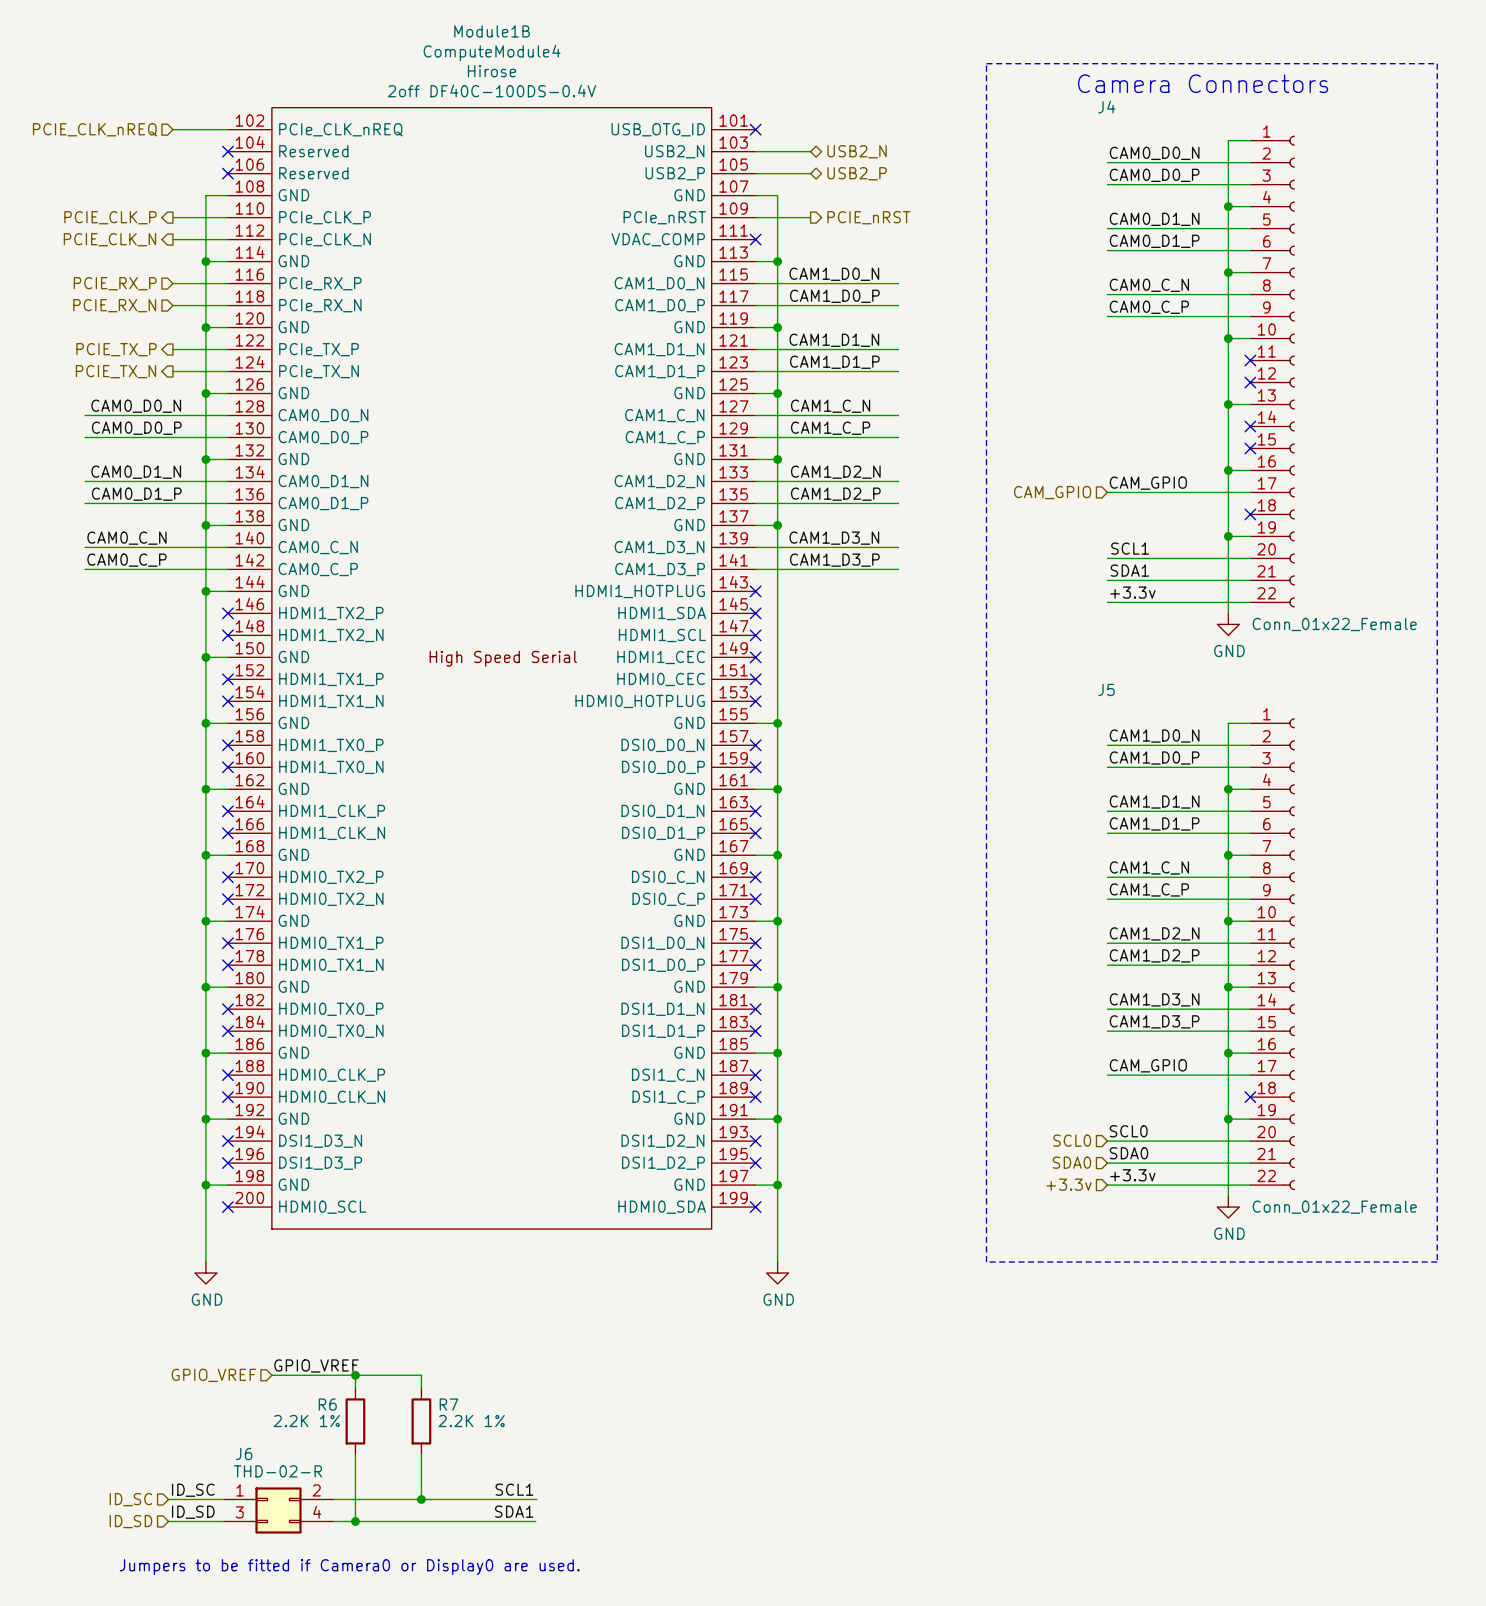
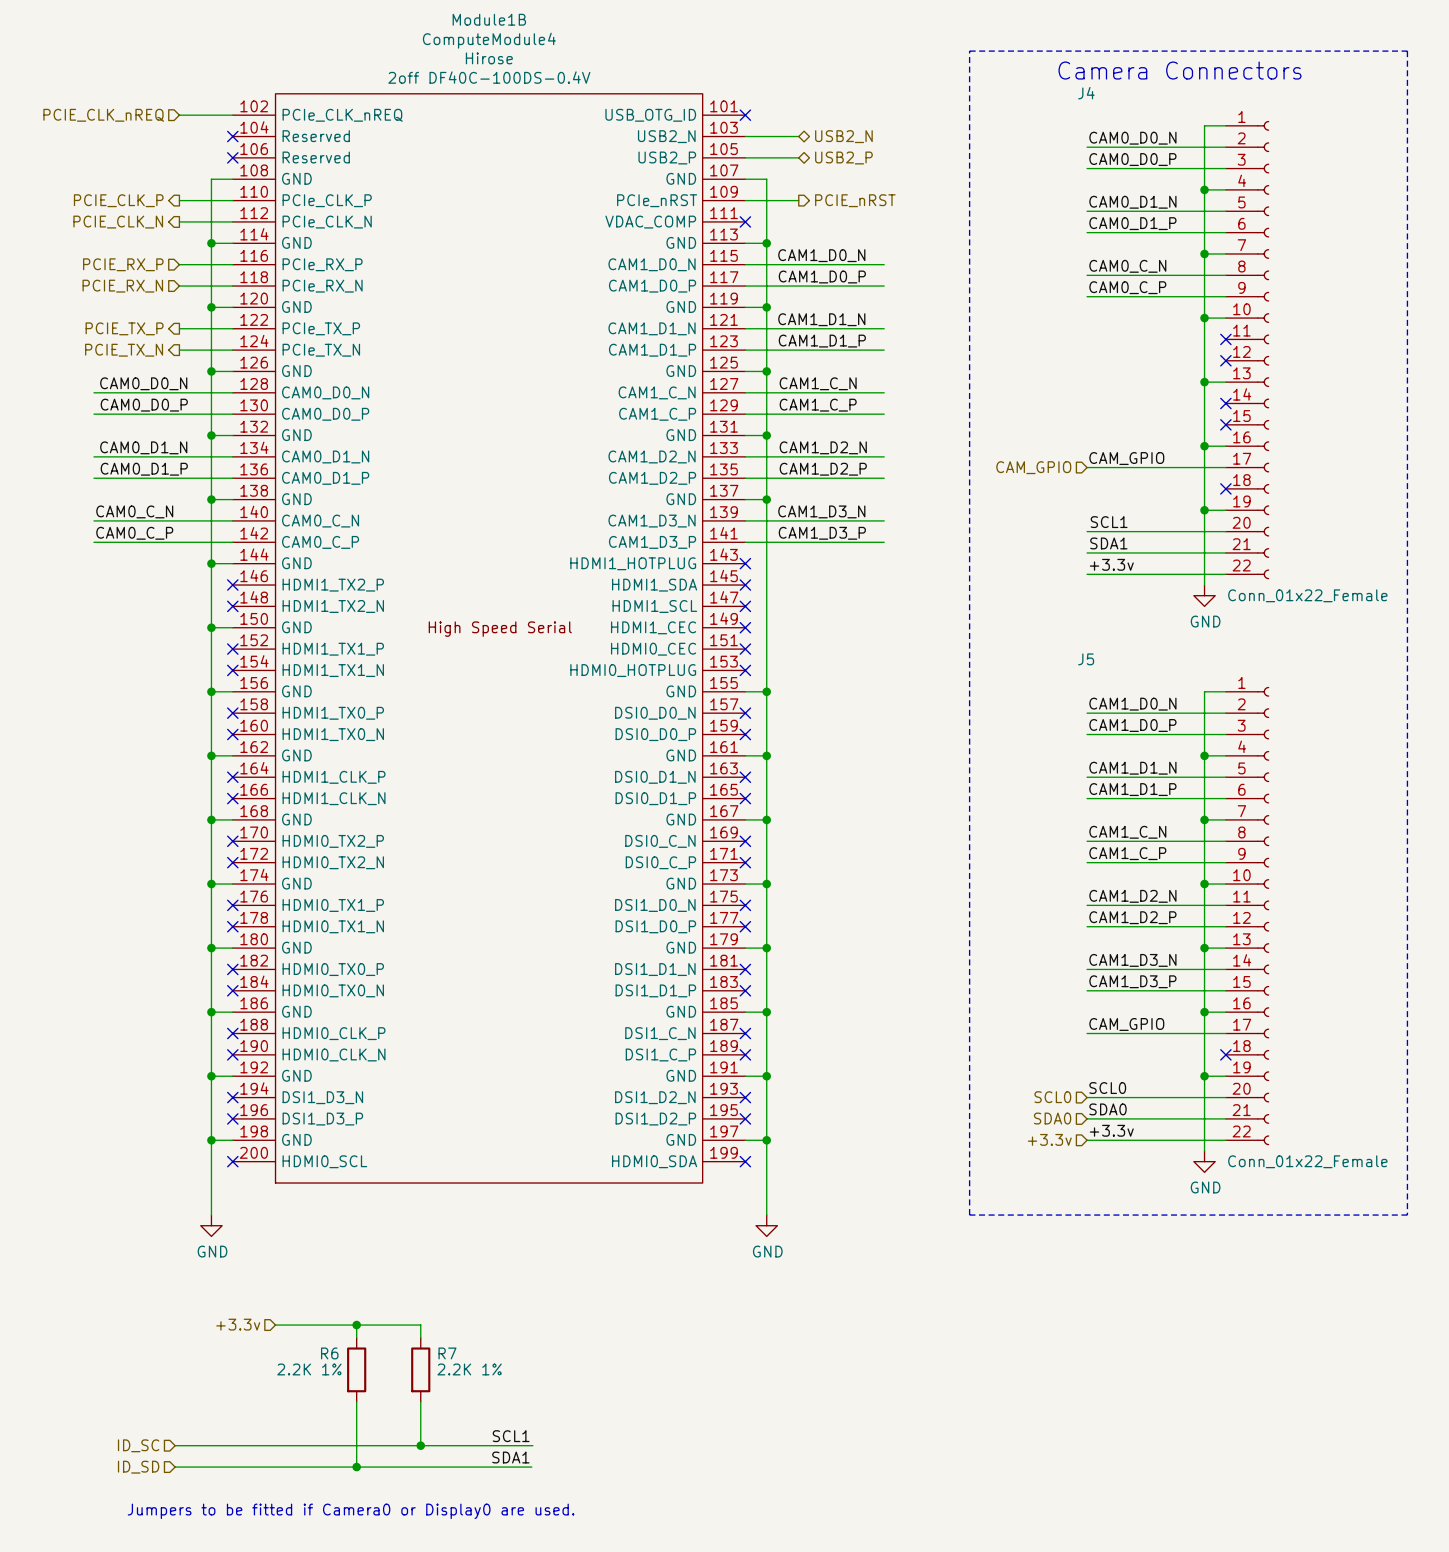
label: GPIO_VREF (316, 1365) -> none
hierarchical label: GPIO_VREF (213, 1375) -> +3.3v (238, 1324)
label: ID_SC (193, 1490) -> none
J6: THD-02-R (278, 1510) -> none
label: ID_SD (193, 1512) -> none

